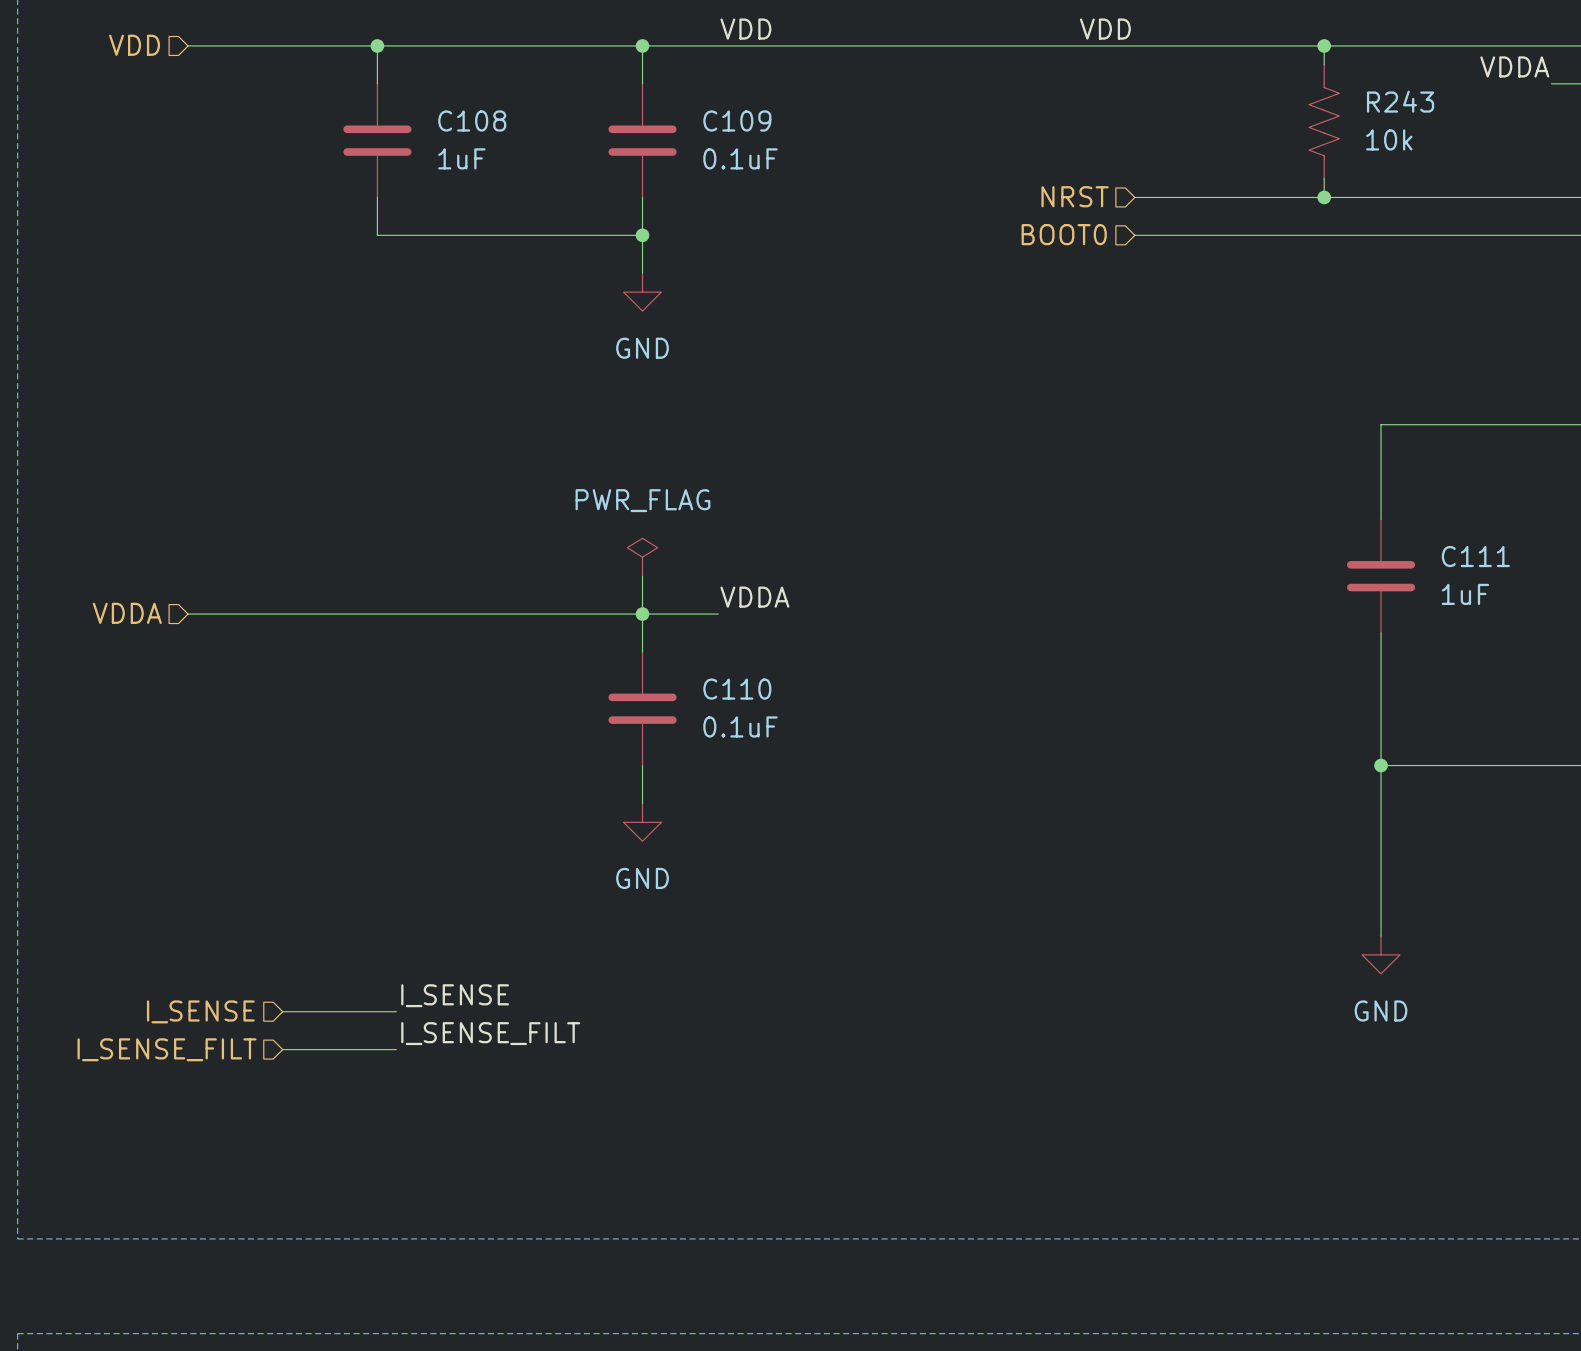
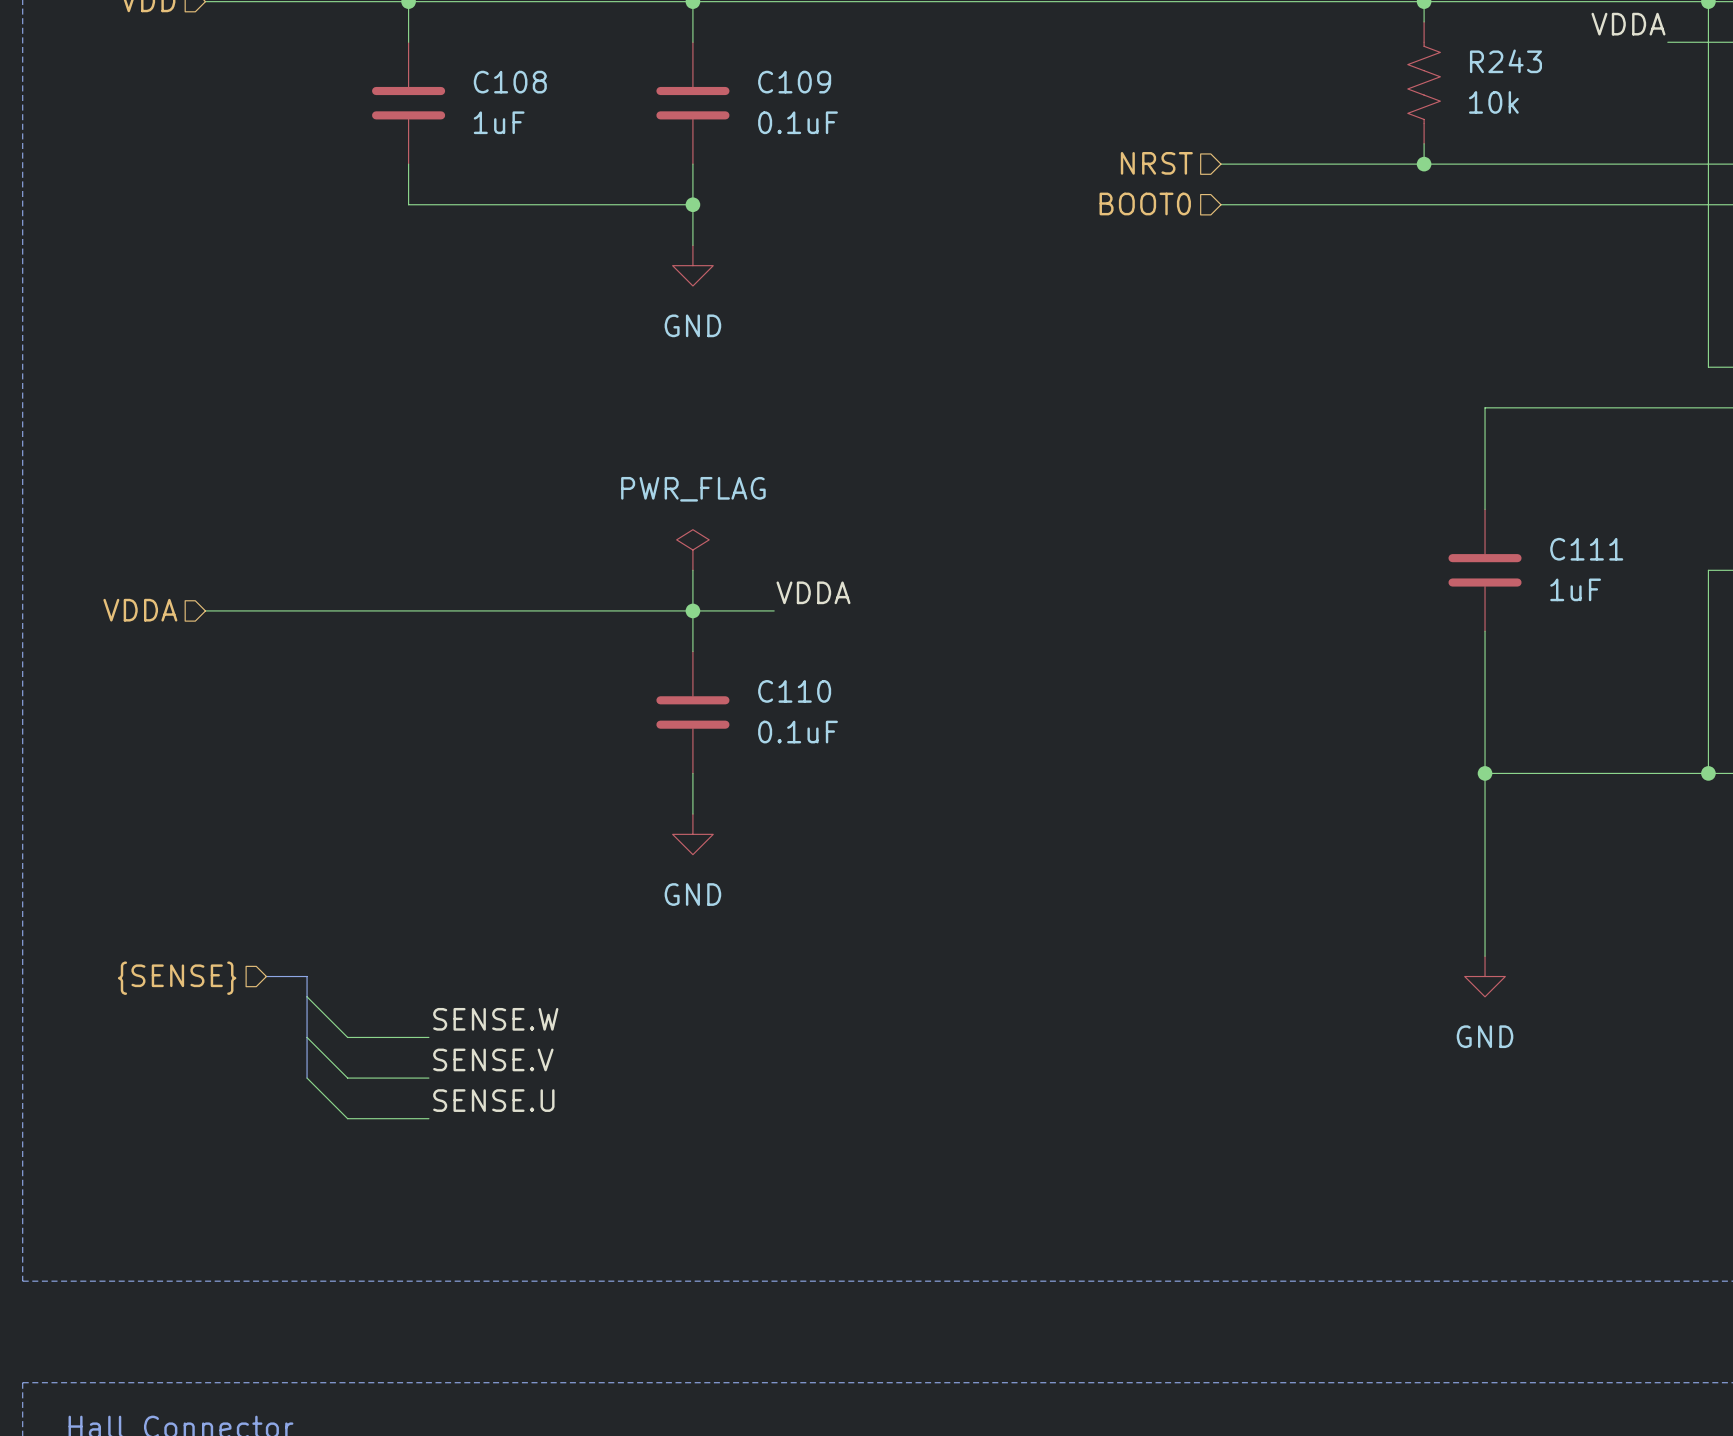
bus: none -> (266, 976) (307, 976) (307, 1078)
hierarchical label: none -> {SENSE} (177, 978)
label: I_SENSE (455, 995) -> SENSE.W (495, 1019)
hierarchical label: I_SENSE (200, 1011) -> none
wire: (282, 1011) (320, 1011) -> (307, 996) (347, 1037)
label: I_SENSE_FILT (490, 1033) -> SENSE.V (493, 1059)
hierarchical label: I_SENSE_FILT (167, 1049) -> none
wire: (282, 1049) (320, 1049) -> (307, 1037) (347, 1078)
wire: none -> (307, 1078) (347, 1118) (428, 1118)
label: none -> SENSE.U (493, 1100)

